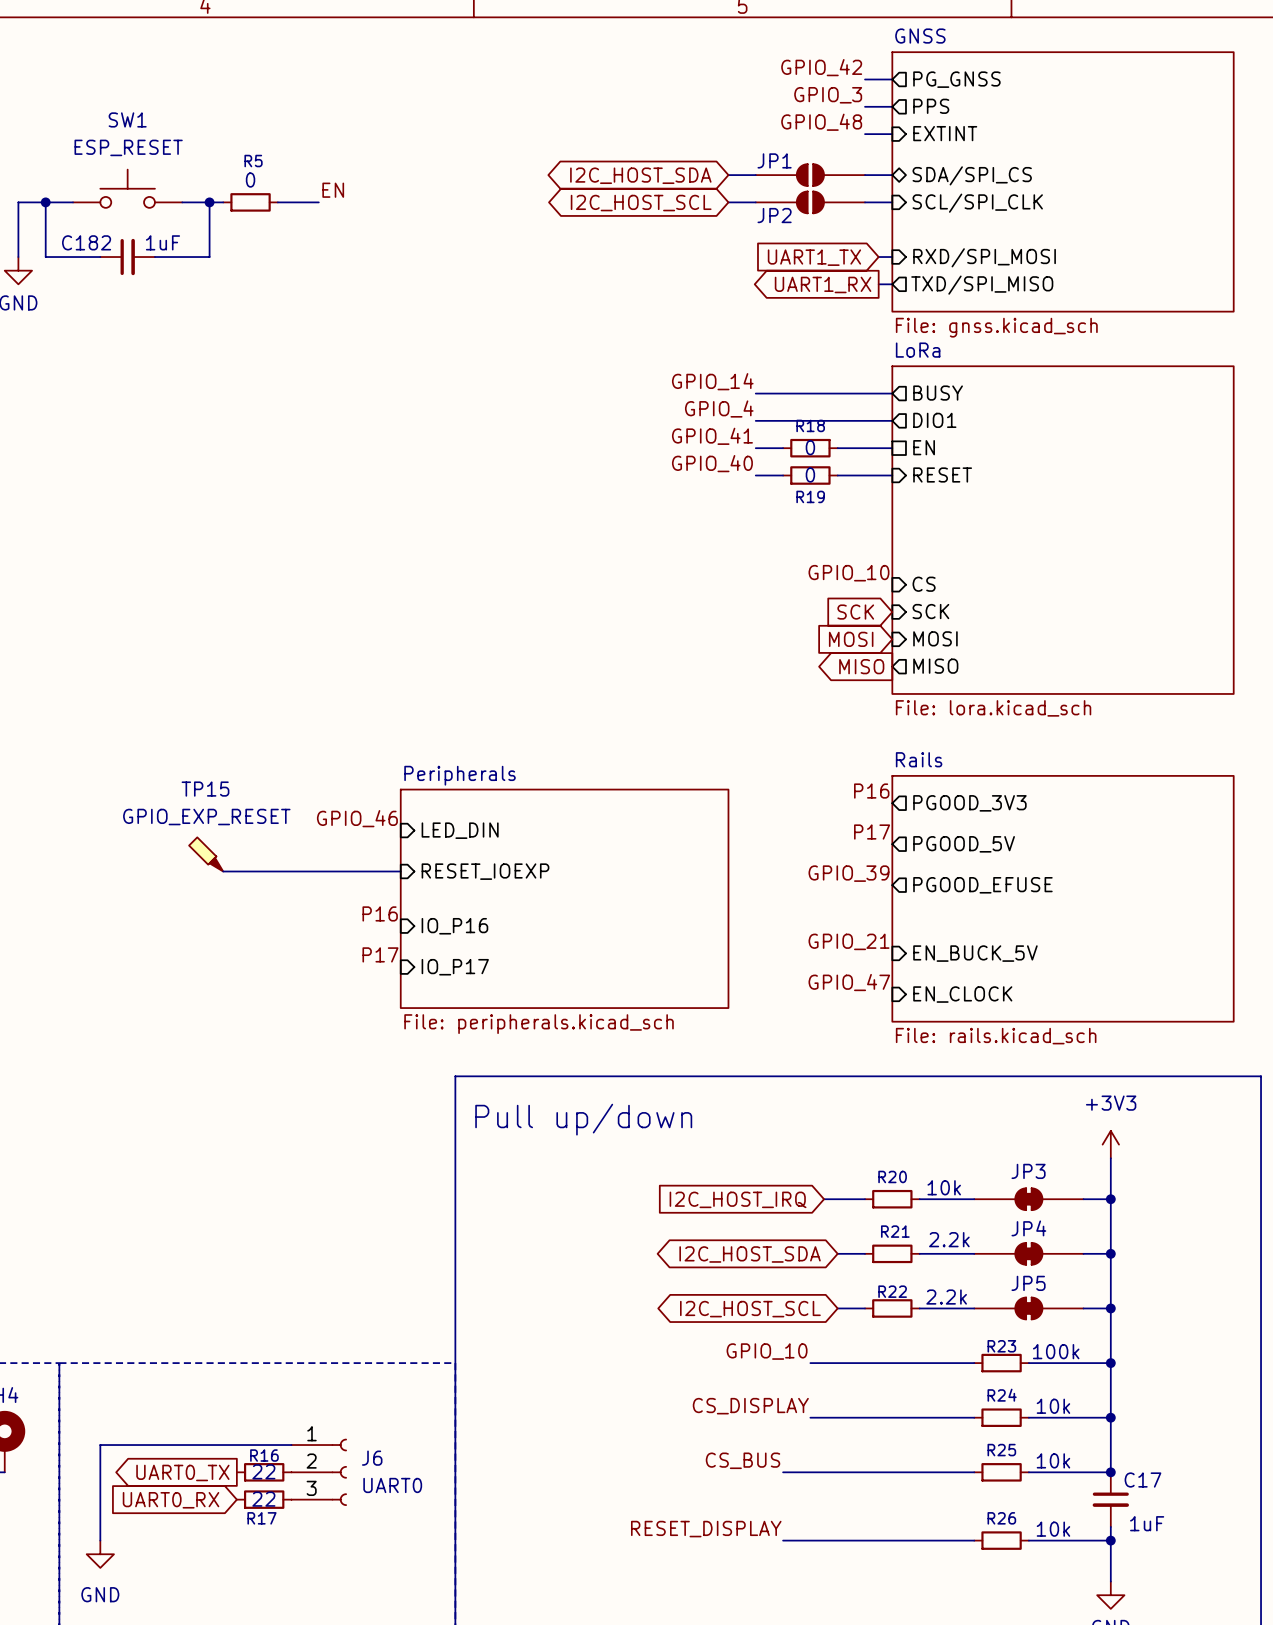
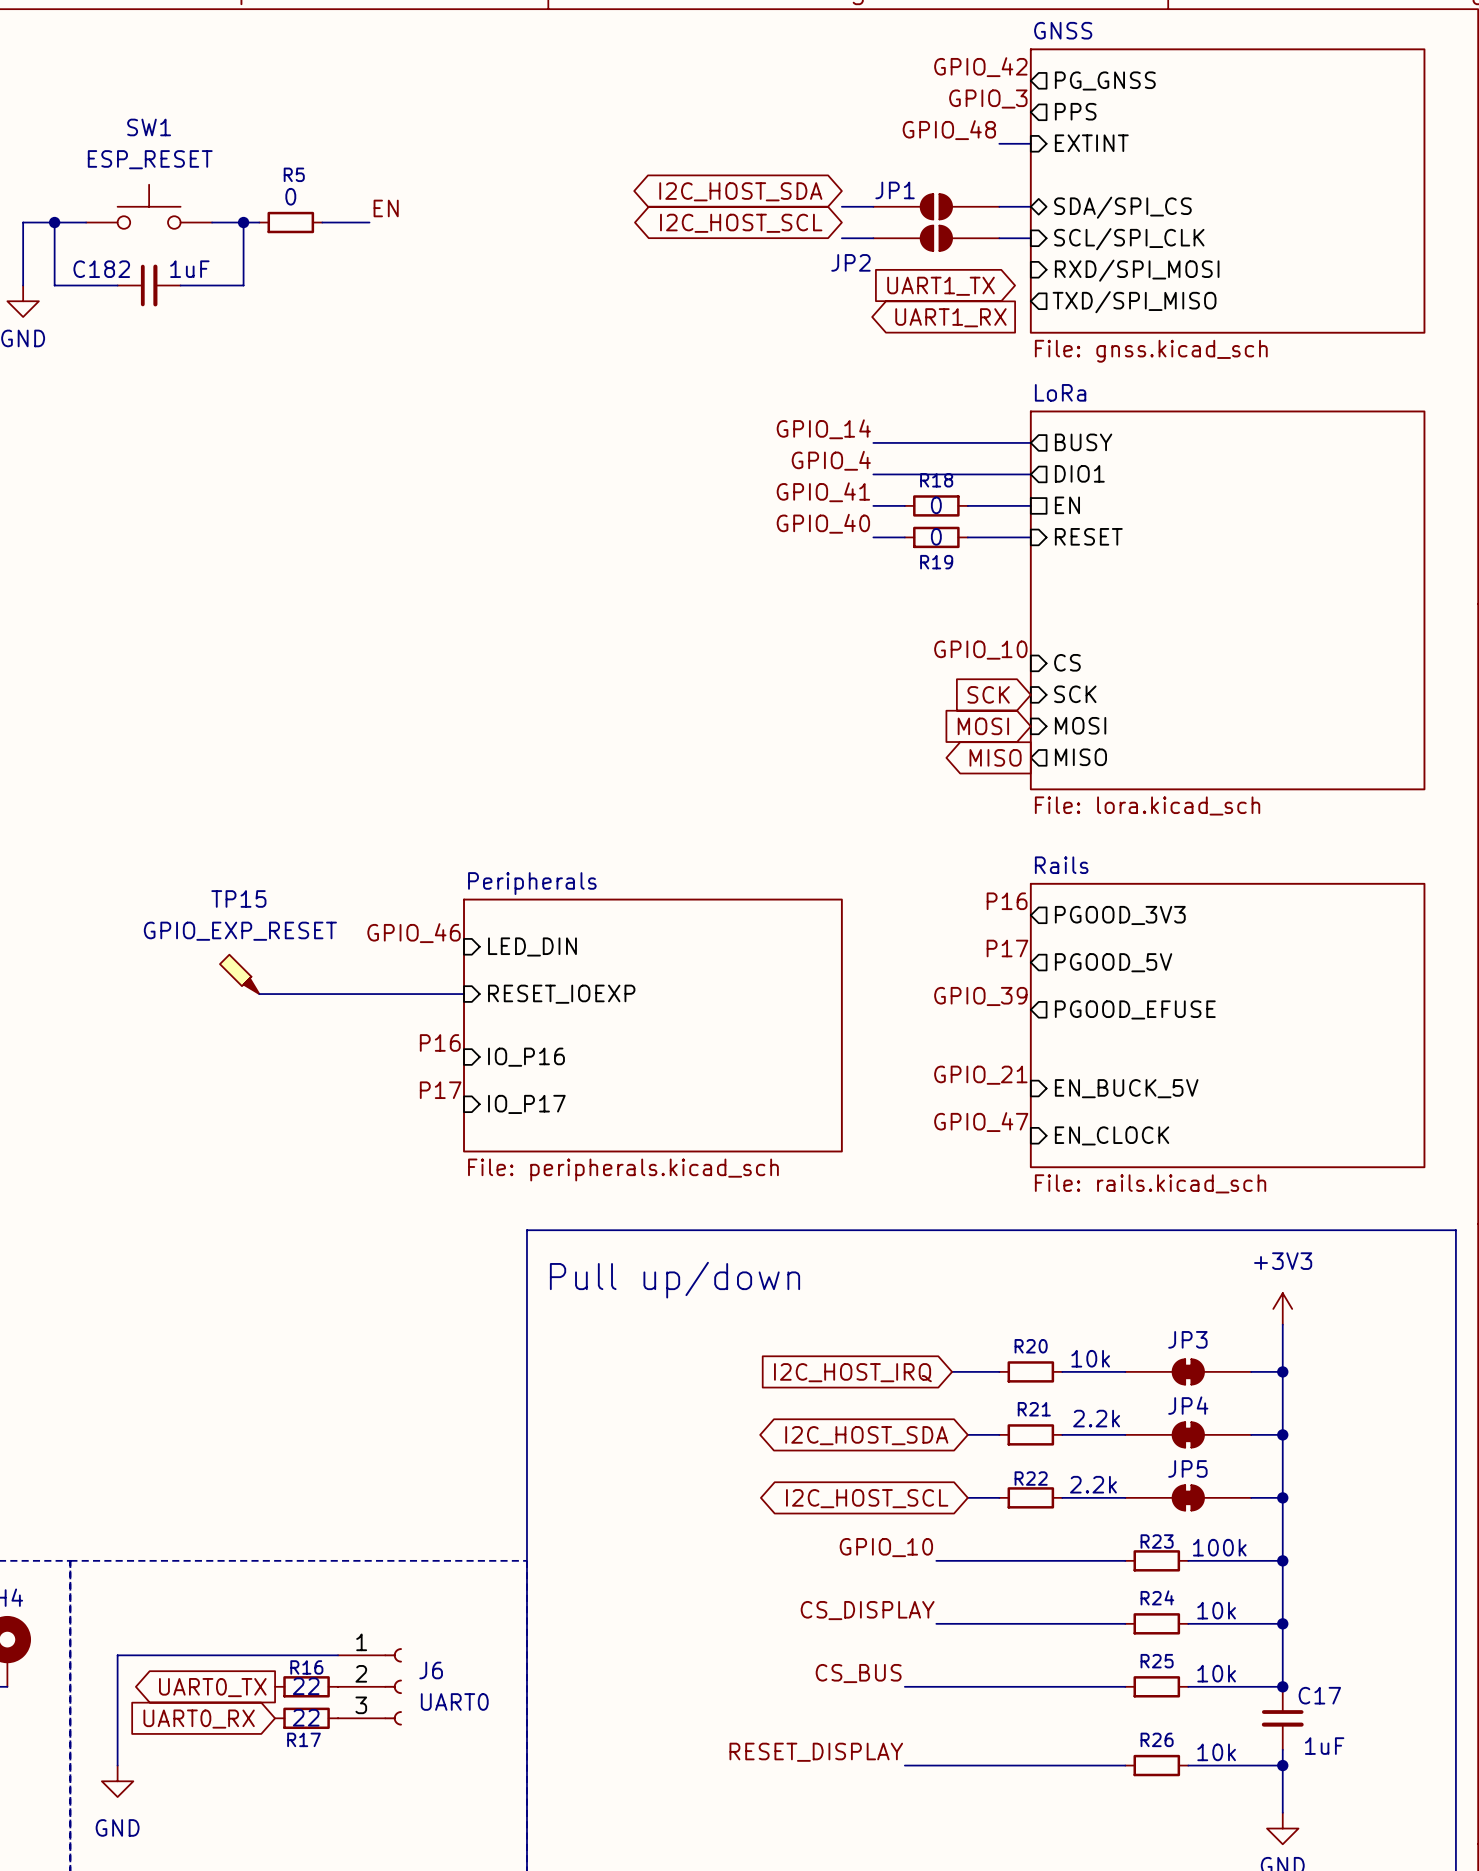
sheet GNSS shape: [891, 51, 1235, 313] -> [1029, 48, 1426, 334]
label position: GPIO_42 (821, 67) -> GPIO_42 (980, 67)
wire: (865, 79) (892, 79) -> none
label position: GPIO_3 (828, 95) -> GPIO_3 (988, 99)
wire: (865, 106) (892, 106) -> none
wire: (728, 175) (755, 175) -> (841, 206) (873, 206)
JP1 position: (810, 175) -> (936, 206)
wire: (865, 175) (892, 175) -> (999, 206) (1030, 206)
sheet pin position: SDA/SPI_CS (972, 175) -> SDA/SPI_CS (1122, 207)
wire: (728, 202) (755, 202) -> (841, 238) (873, 238)
JP2 position: (810, 202) -> (936, 238)
wire: (865, 202) (892, 202) -> (999, 238) (1030, 238)
sheet pin position: SCL/SPI_CLK (977, 203) -> SCL/SPI_CLK (1129, 239)
JP2 name position: JP2 (774, 215) -> JP2 (850, 262)
wire: (878, 257) (892, 257) -> none
sheet pin position: RXD/SPI_MOSI (984, 257) -> RXD/SPI_MOSI (1137, 270)
wire: (878, 284) (892, 284) -> none
sheet pin position: TXD/SPI_MISO (982, 285) -> TXD/SPI_MISO (1134, 302)

